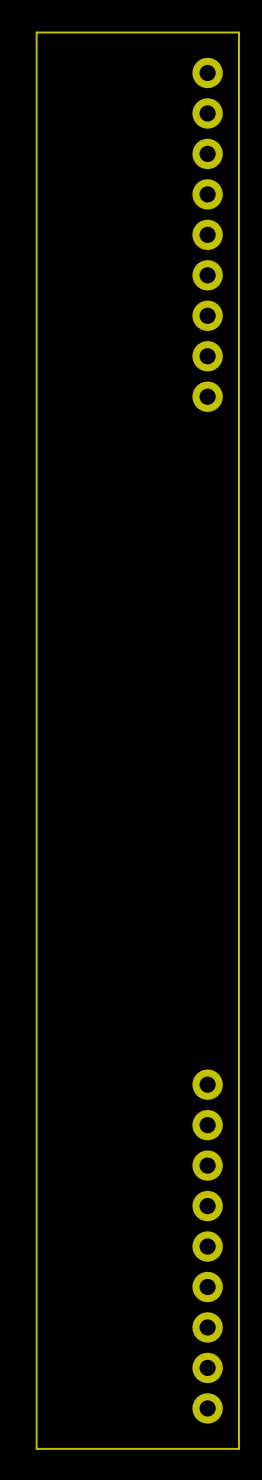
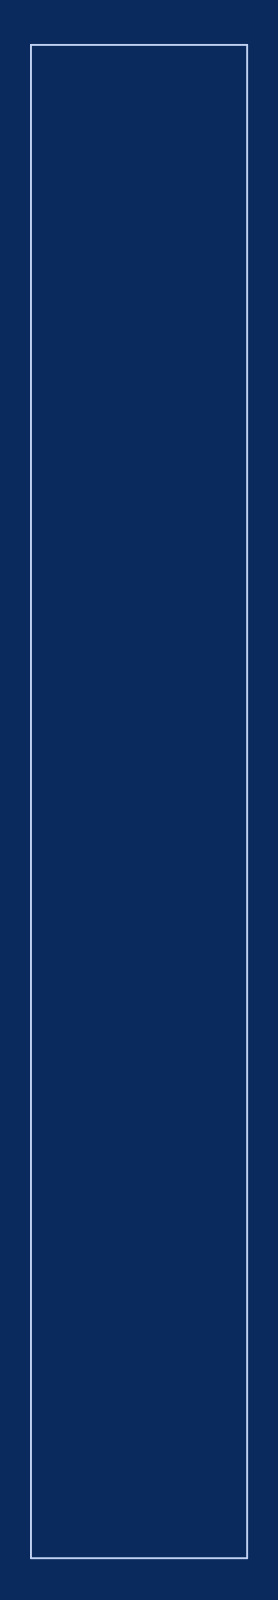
part: (207, 234) -> none
part: (207, 1246) -> none

